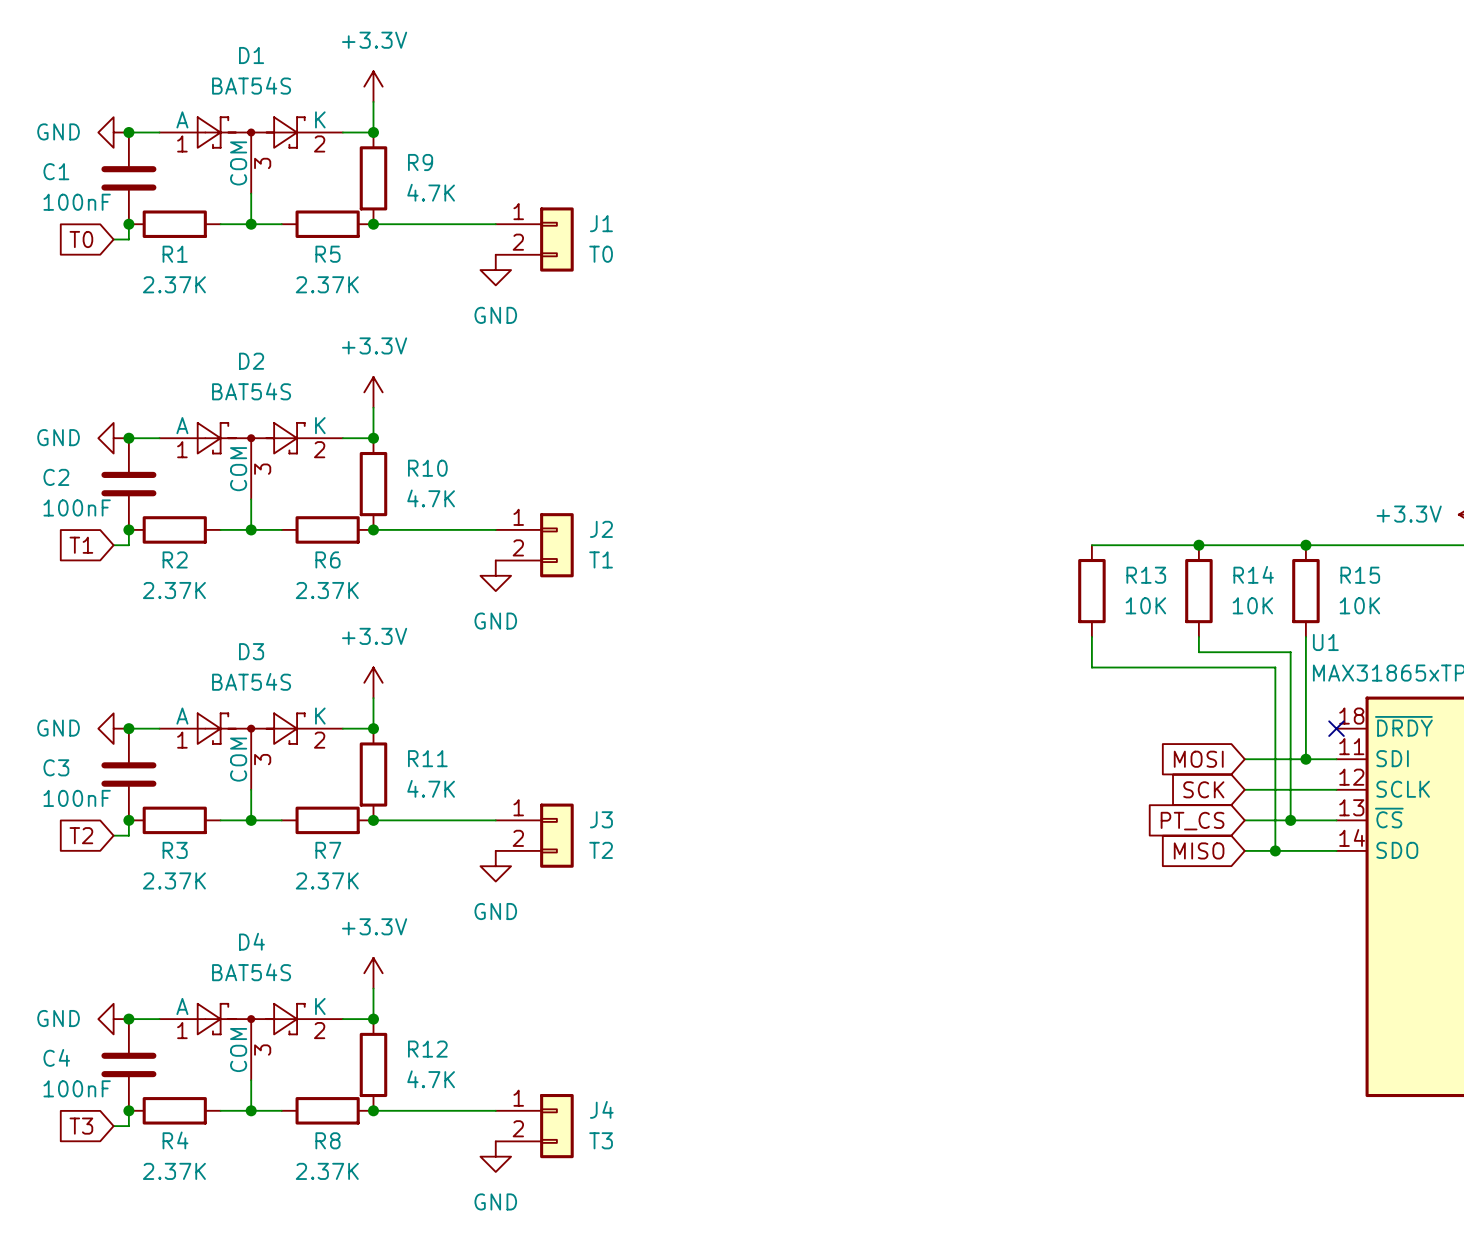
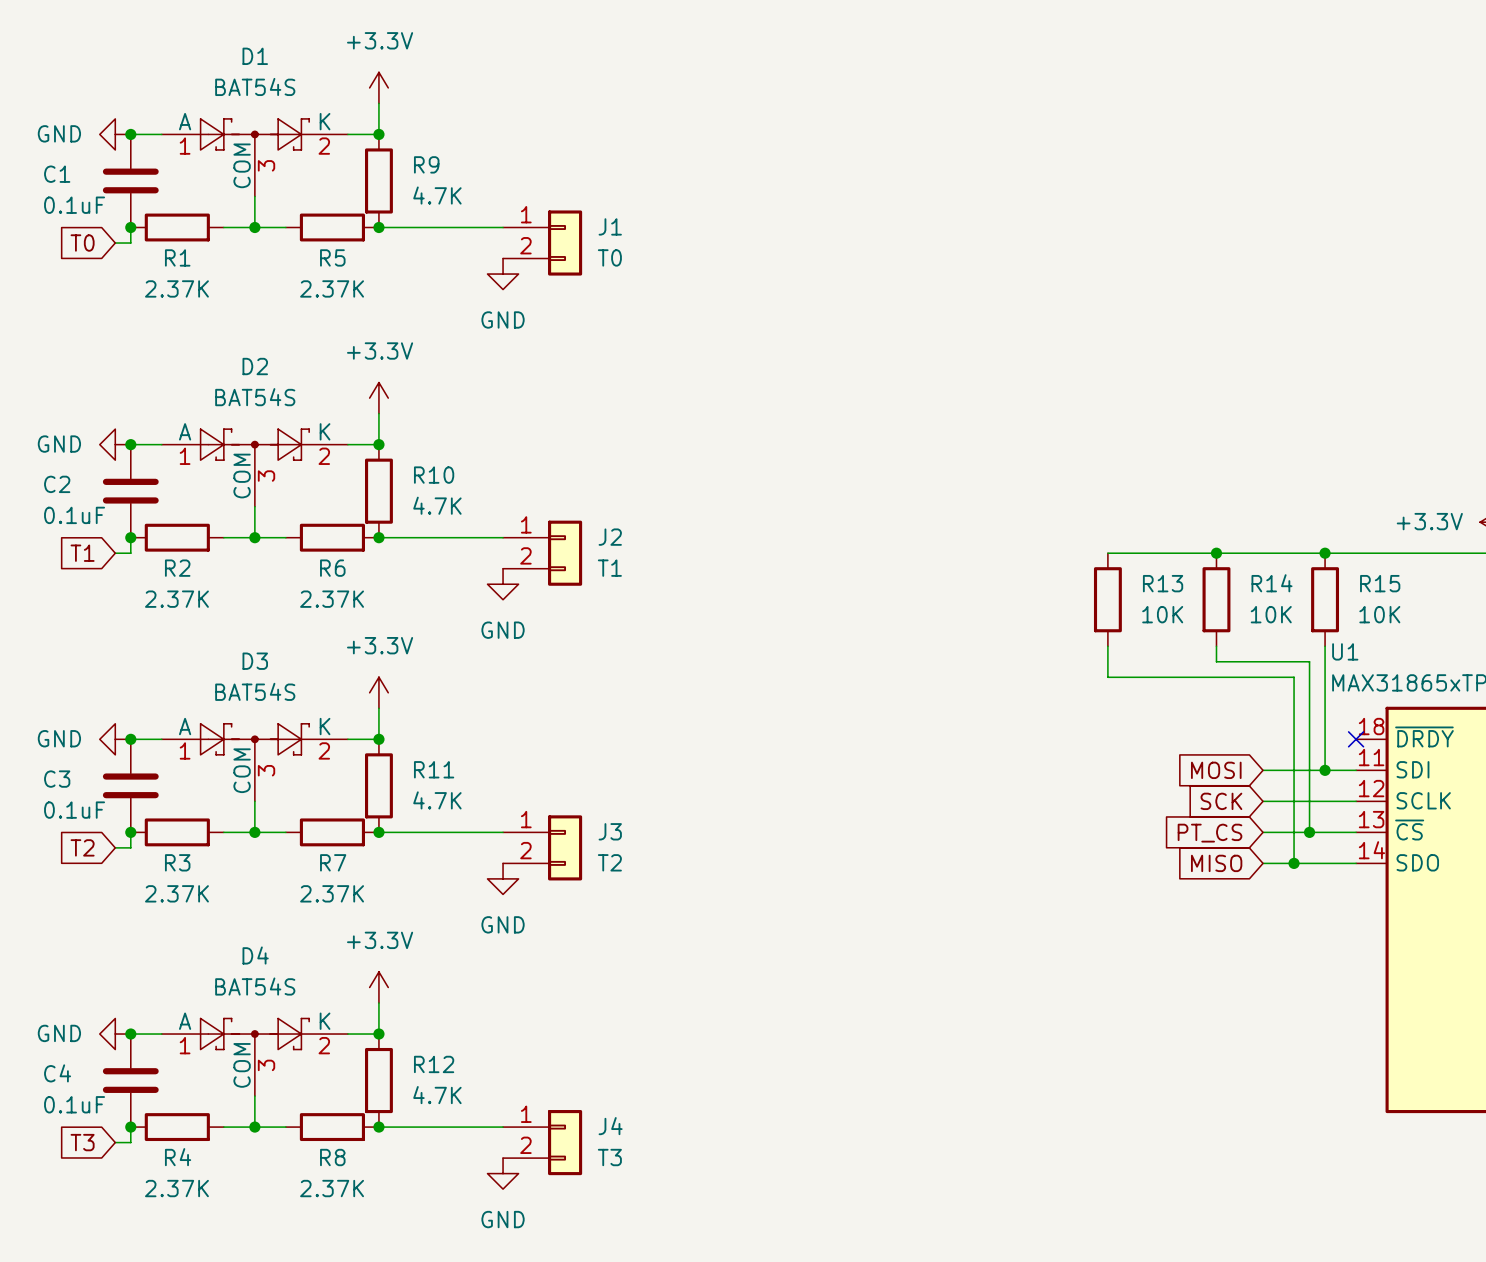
C1 value: 100nF (77, 202) -> 0.1uF (74, 205)
C2 value: 100nF (77, 507) -> 0.1uF (74, 515)
C3 value: 100nF (77, 798) -> 0.1uF (74, 810)
C4 value: 100nF (77, 1088) -> 0.1uF (74, 1104)

